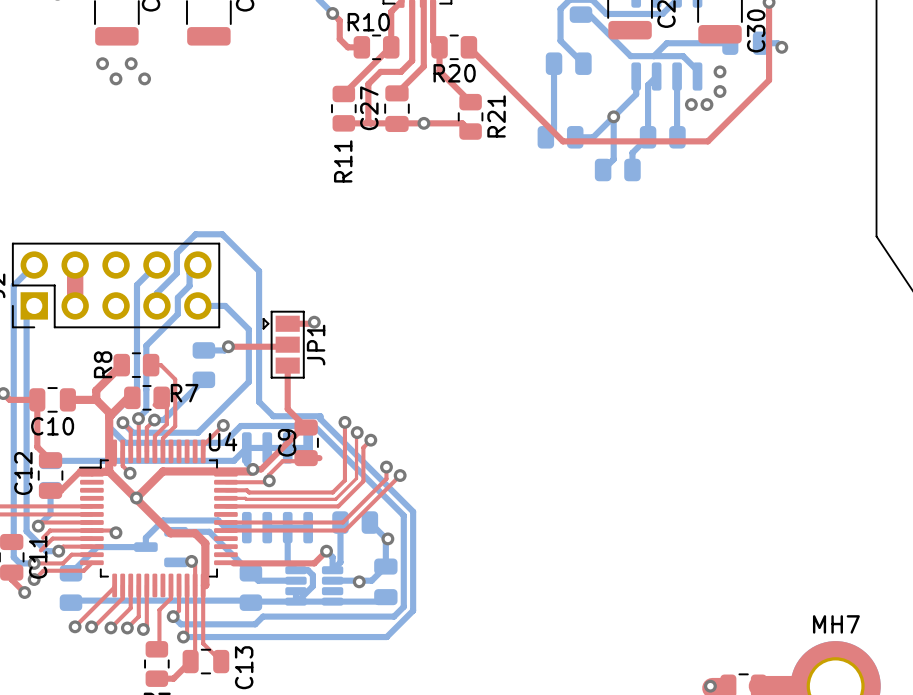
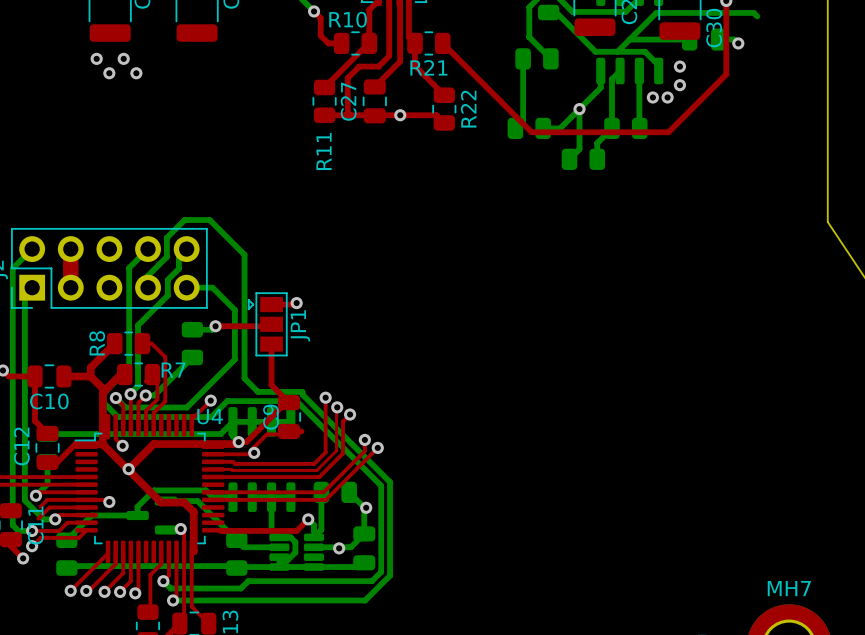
bottom track: none -> (757, 16) (753, 12) (656, 12) (629, 39)
R20 name: R20 (454, 73) -> R21 (428, 67)
R21 name: R21 (496, 116) -> R22 (468, 109)

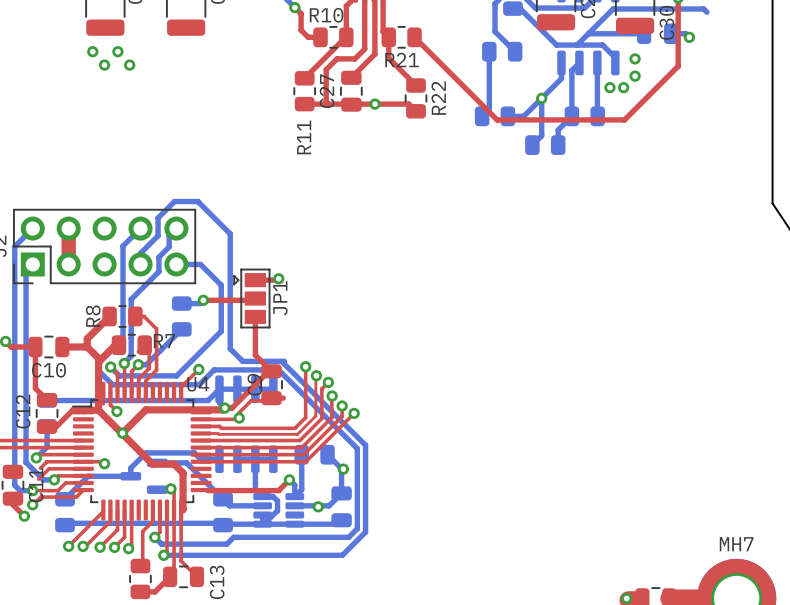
top track: none -> (332, 396) (331, 417) (301, 447) (201, 447)
via: none -> (332, 396)

